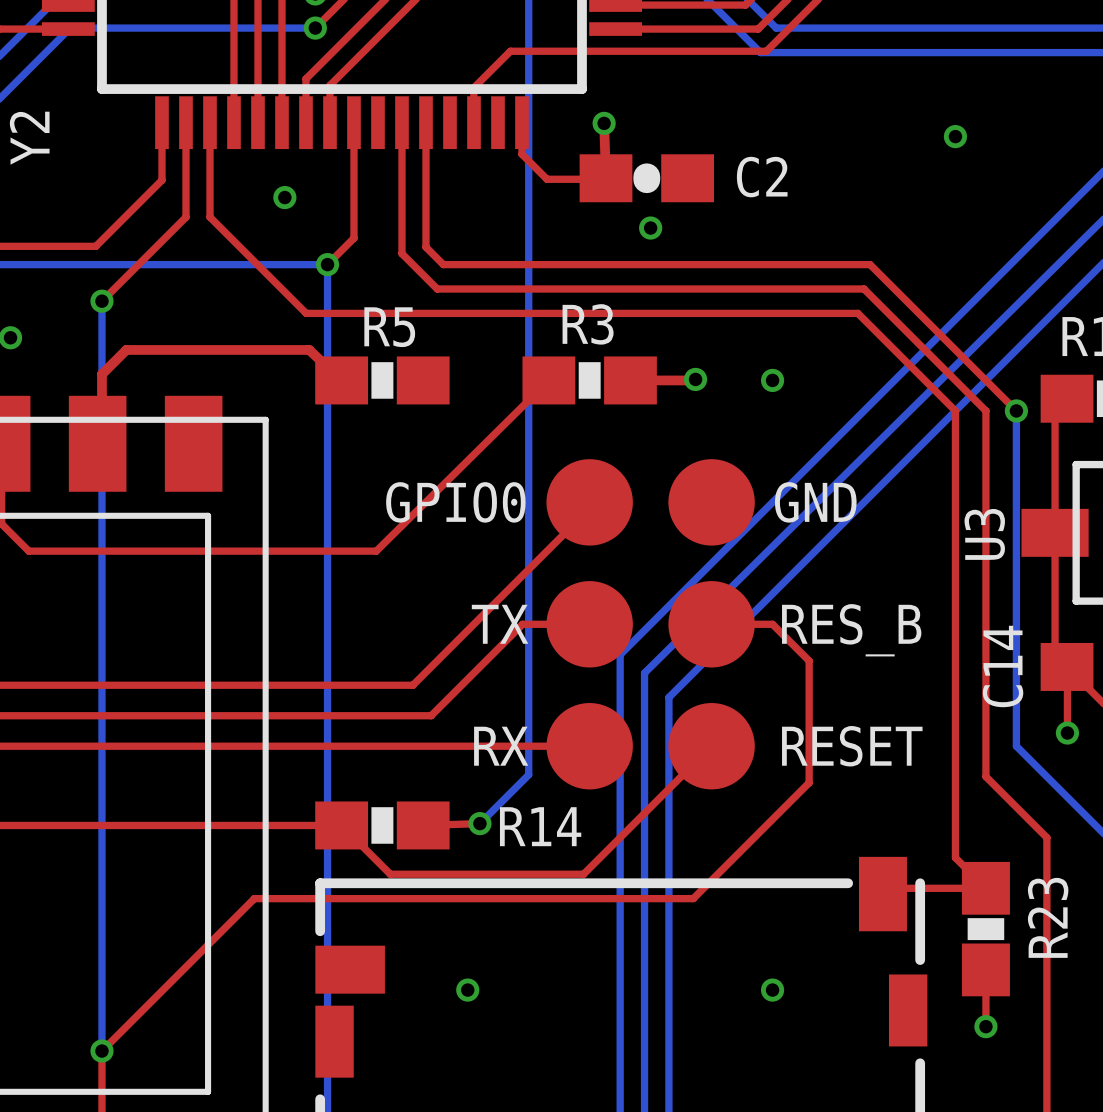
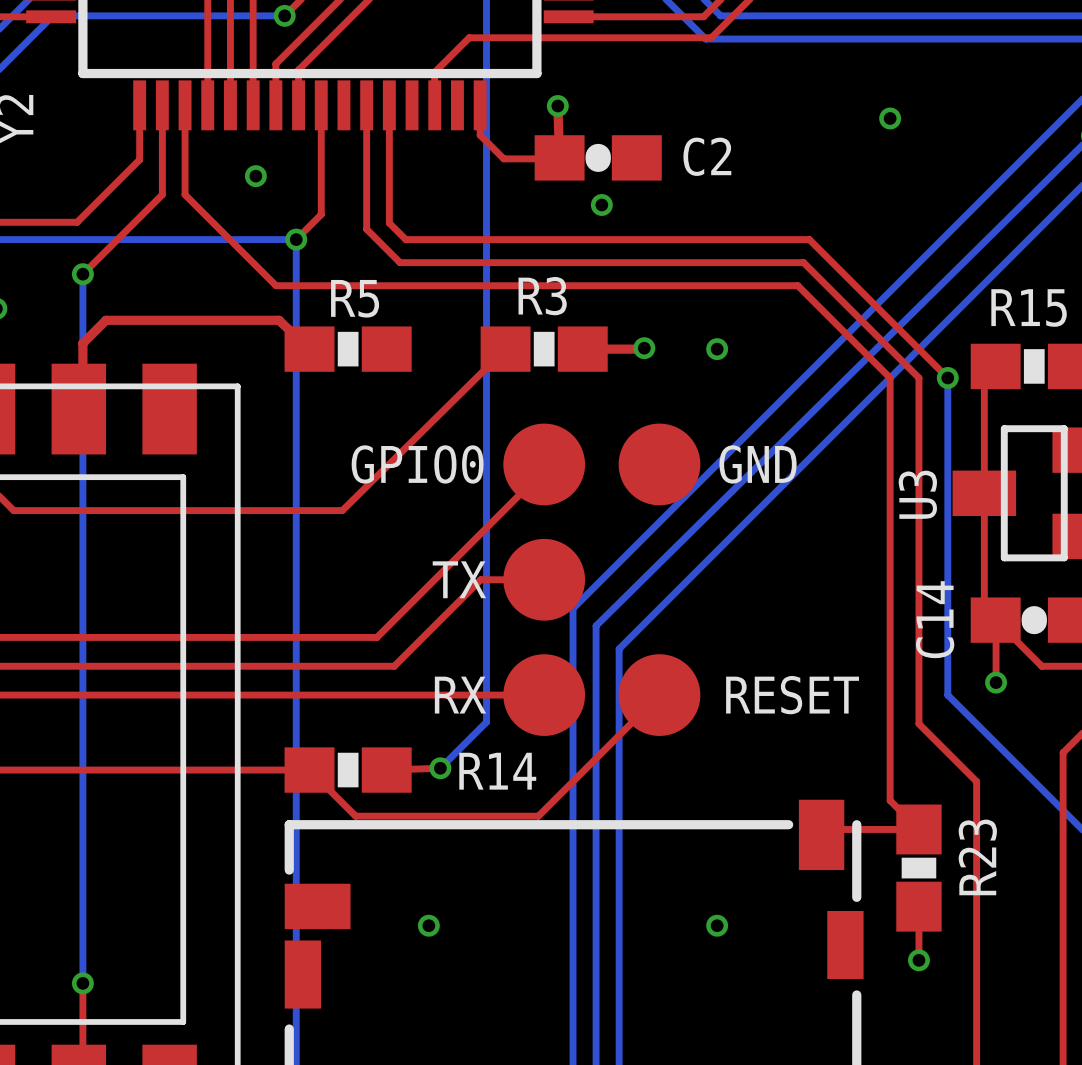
top track: (711, 624) (772, 624) (809, 660) (809, 782) (693, 898) (254, 898) (101, 1051) -> none
RES_B: (711, 624) -> none

